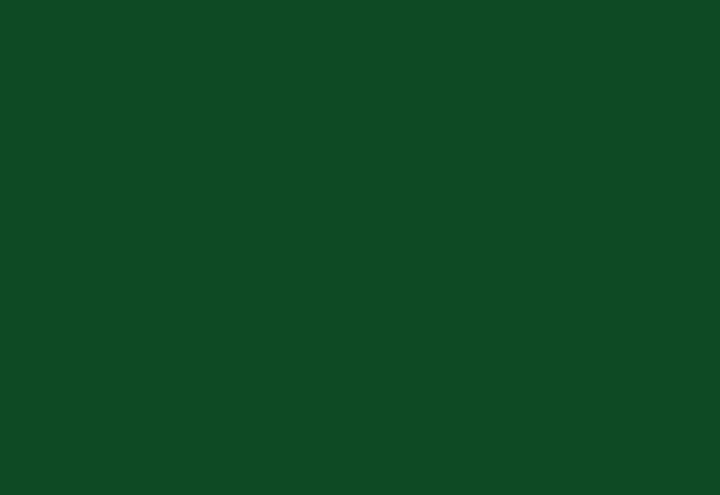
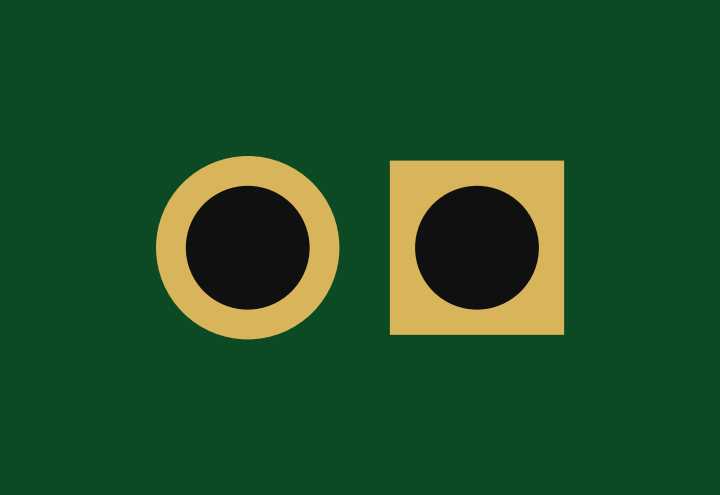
part: none -> (360, 247)

